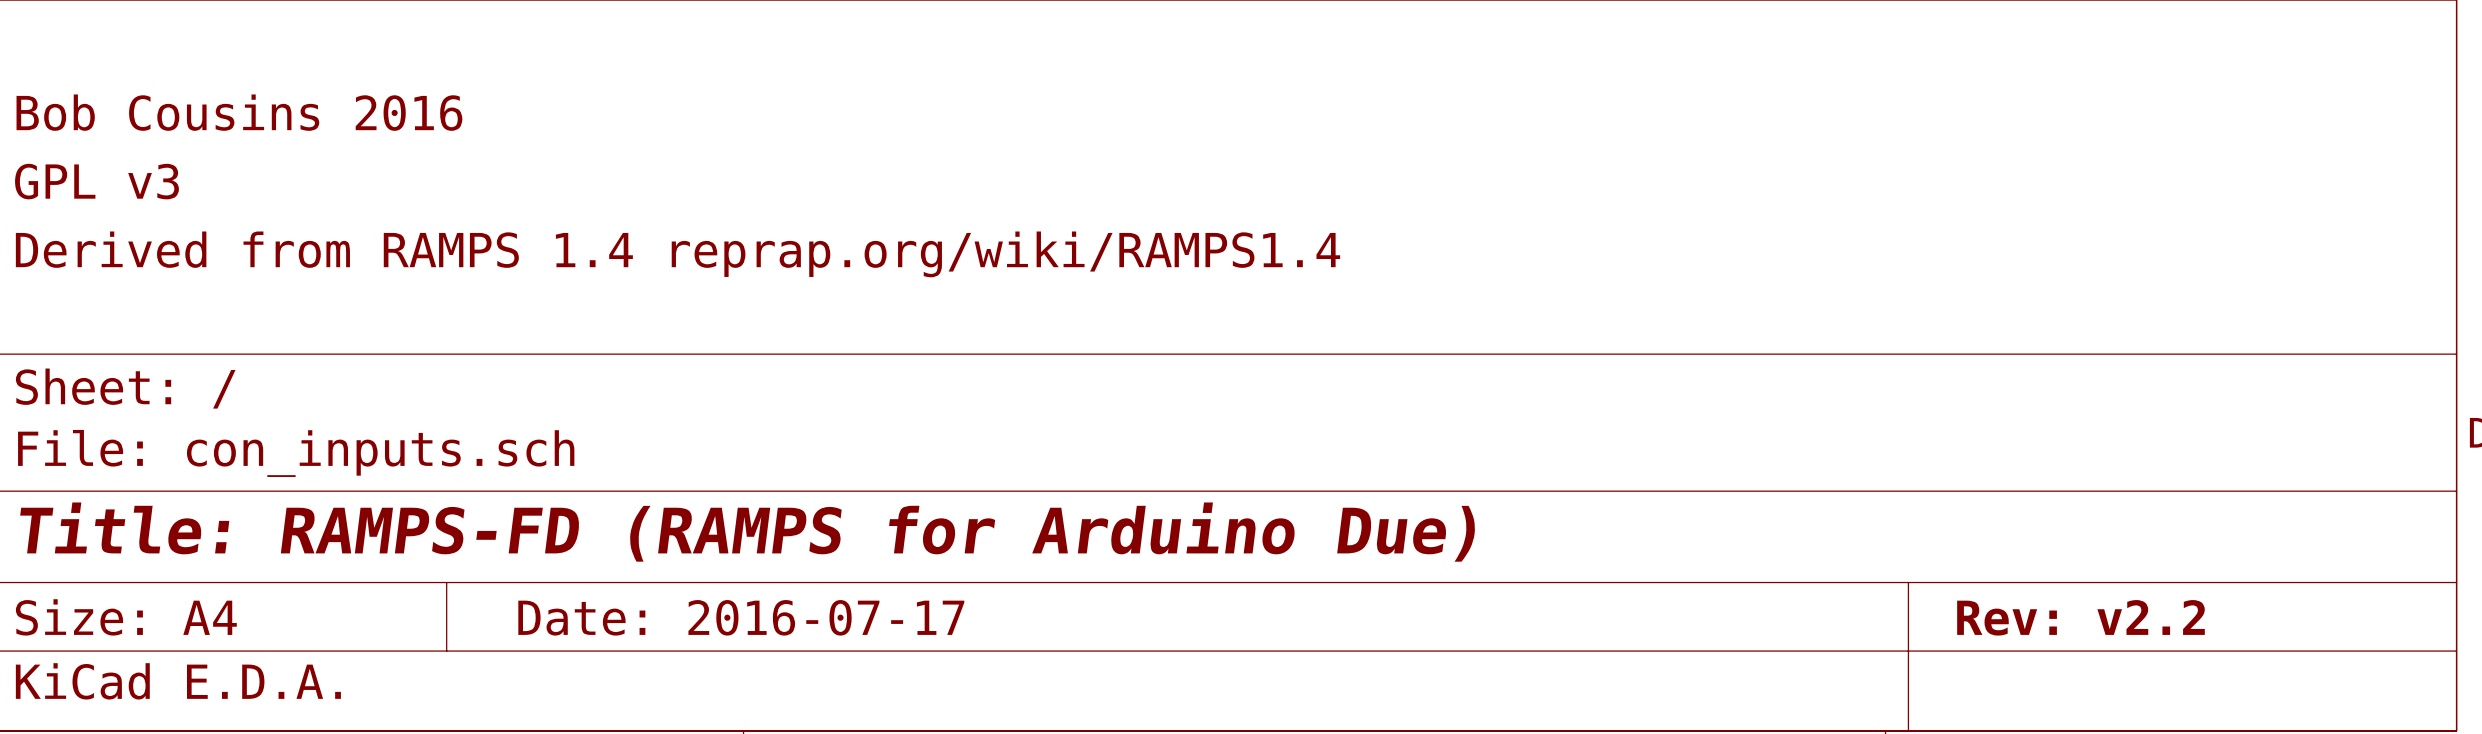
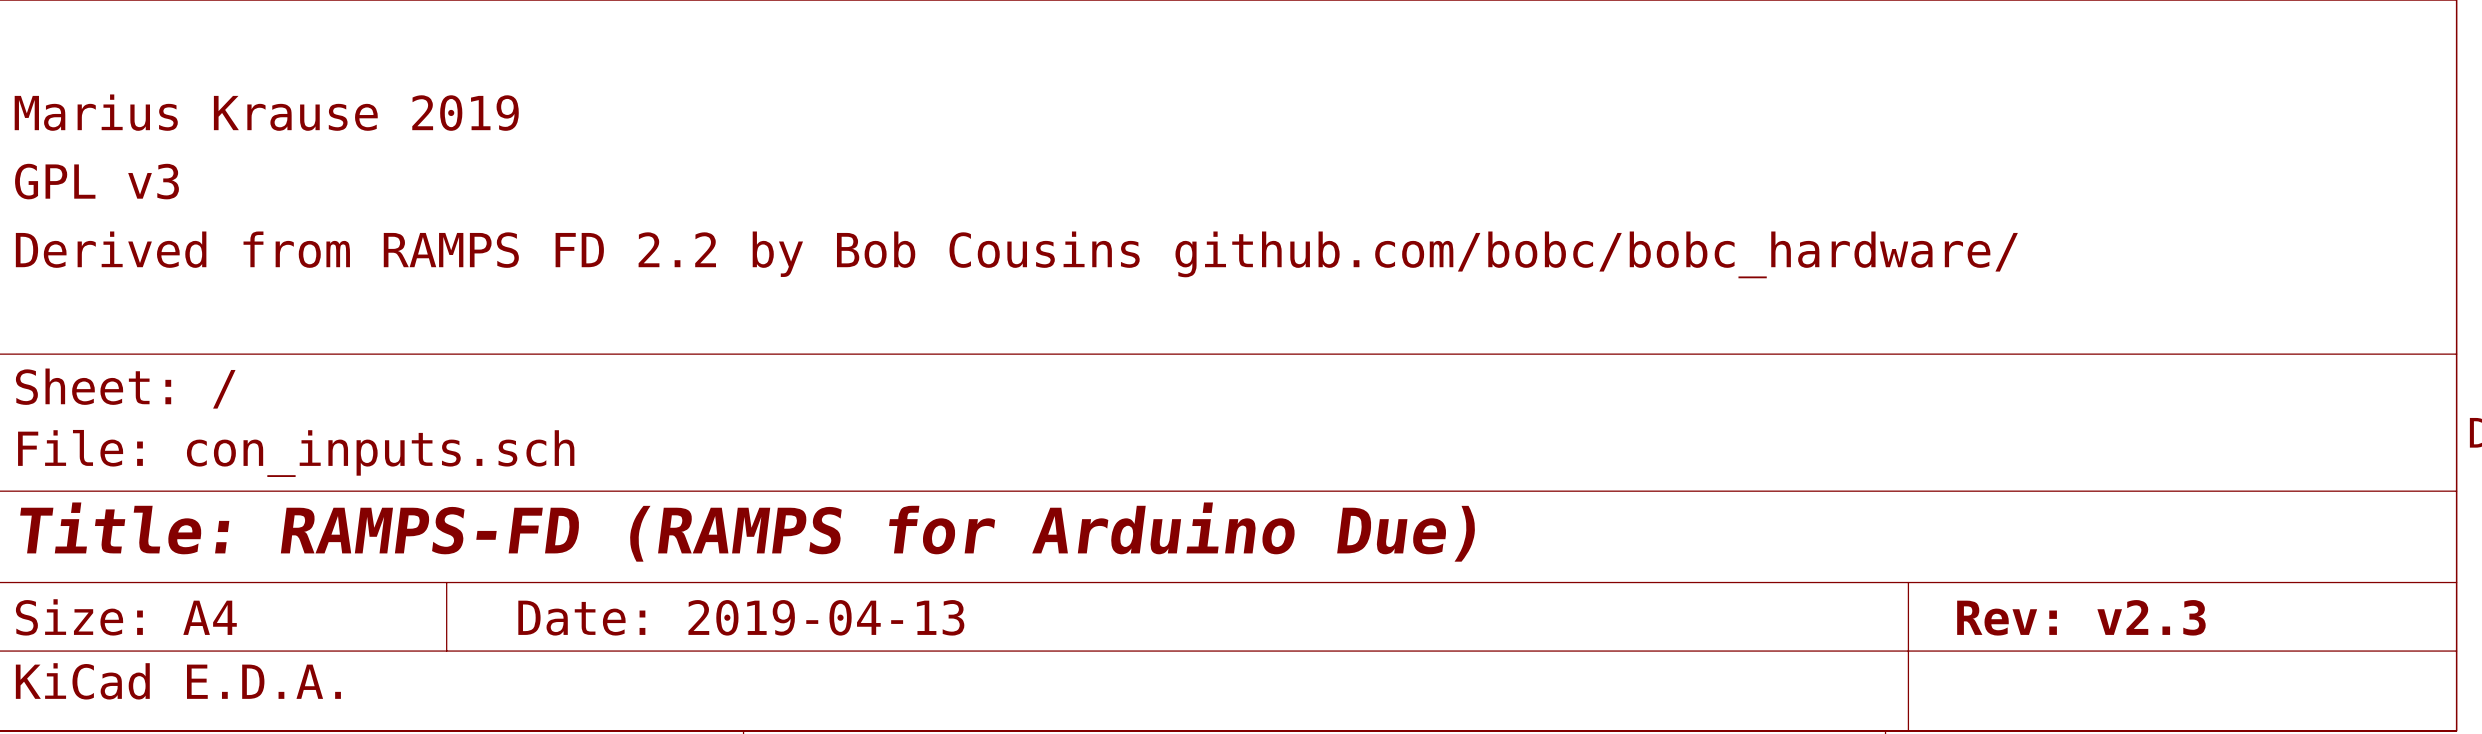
title block: Bob Cousins 2016 (239, 112) -> Marius Krause 2019 (266, 112)
title block: Derived from RAMPS 1.4 reprap.org/wiki/RAMPS1.4 (678, 254) -> Derived from RAMPS FD 2.2 by Bob Cousins github.com/bobc/bobc_hardware/ (1016, 254)
title block: Date: 2016-07-17 (741, 617) -> Date: 2019-04-13 (741, 617)
title block: Rev: v2.2 (2080, 617) -> Rev: v2.3 (2081, 617)

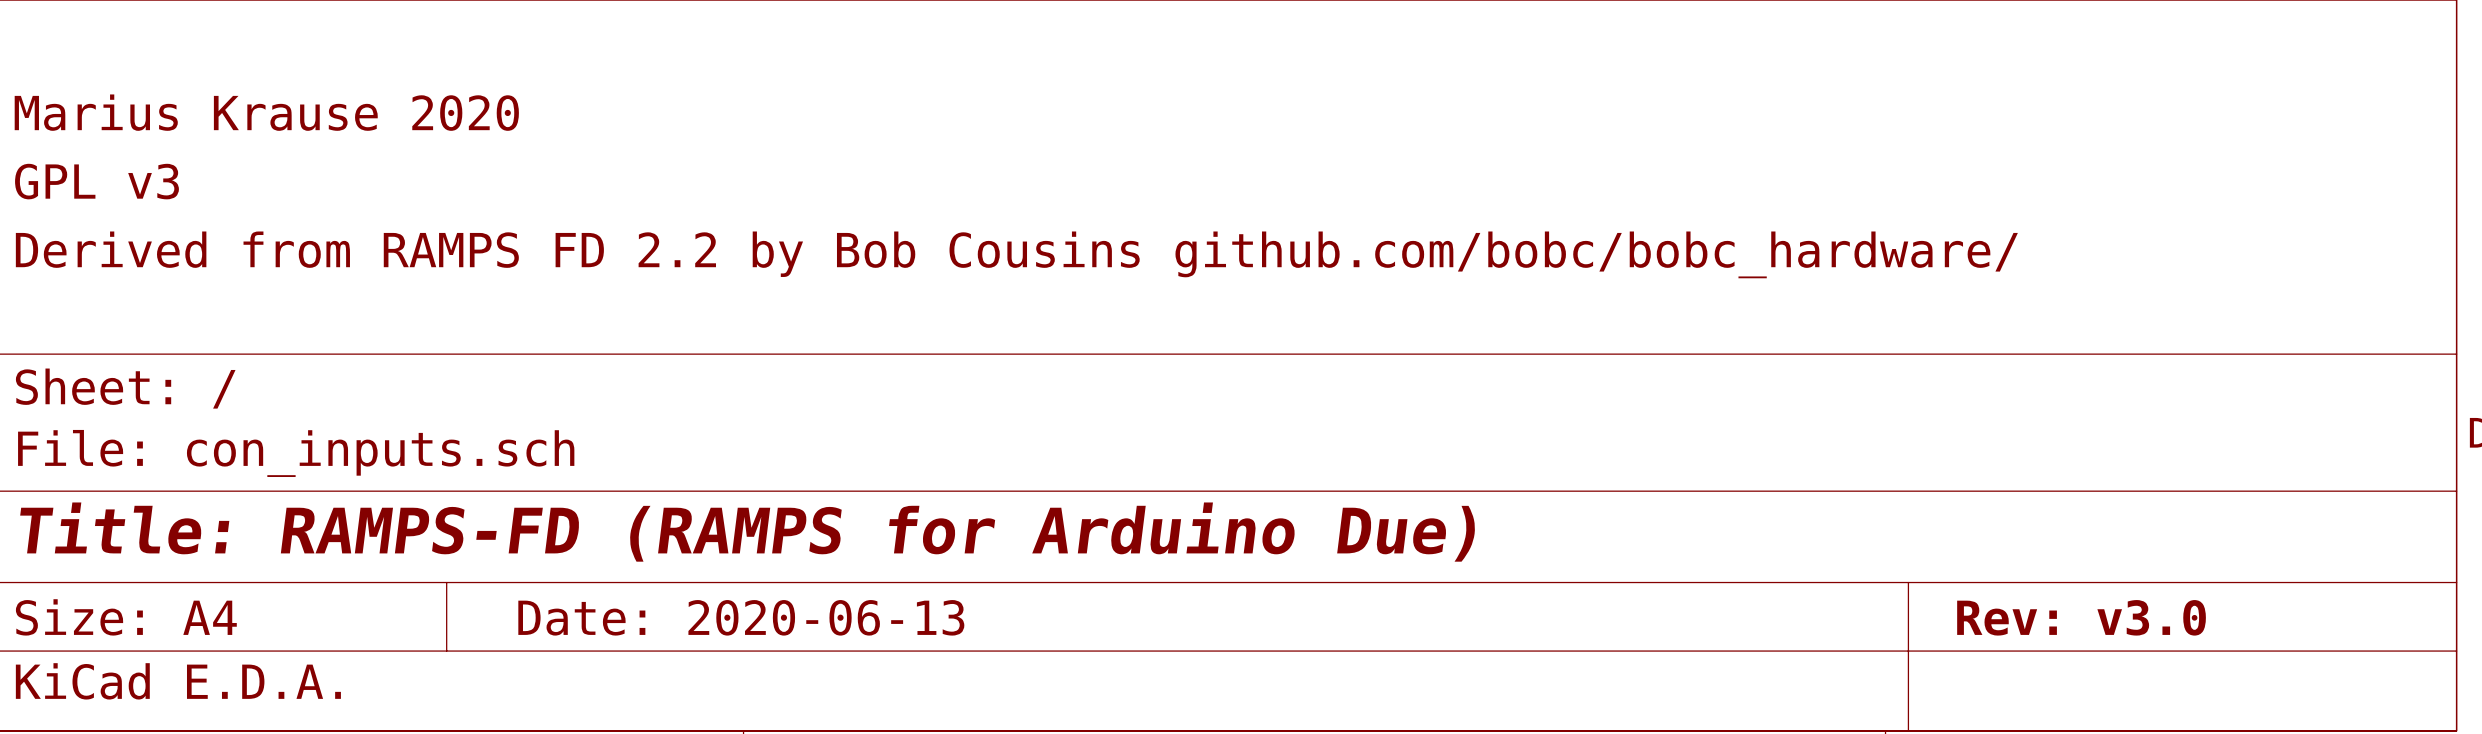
title block: Marius Krause 2019 (266, 112) -> Marius Krause 2020 (266, 112)
title block: Date: 2019-04-13 (741, 617) -> Date: 2020-06-13 (741, 617)
title block: Rev: v2.3 (2081, 617) -> Rev: v3.0 (2081, 617)

